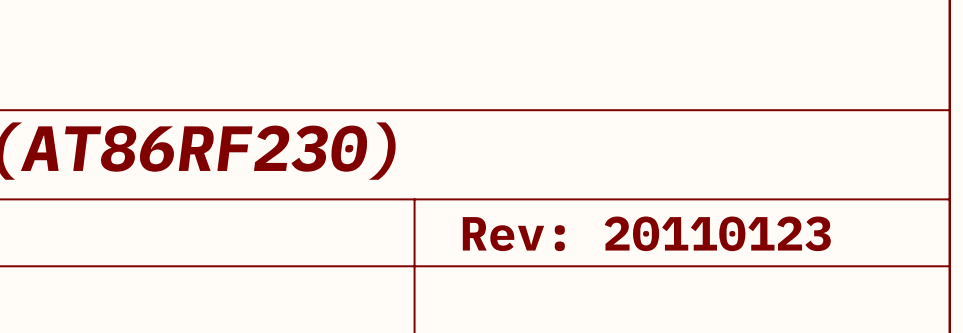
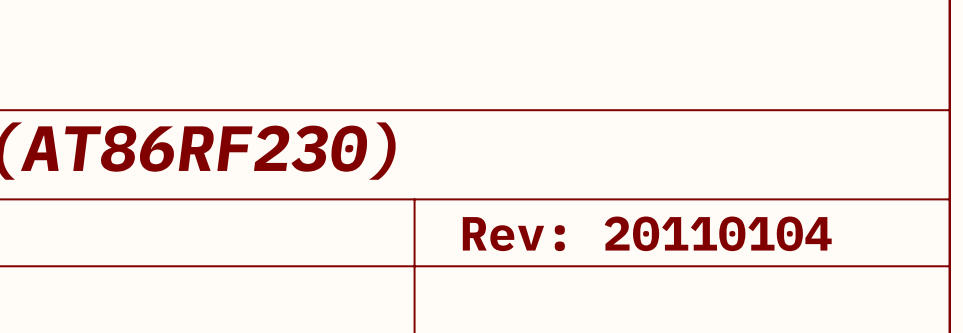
title block: Rev: 20110123 (646, 233) -> Rev: 20110104 (647, 233)

